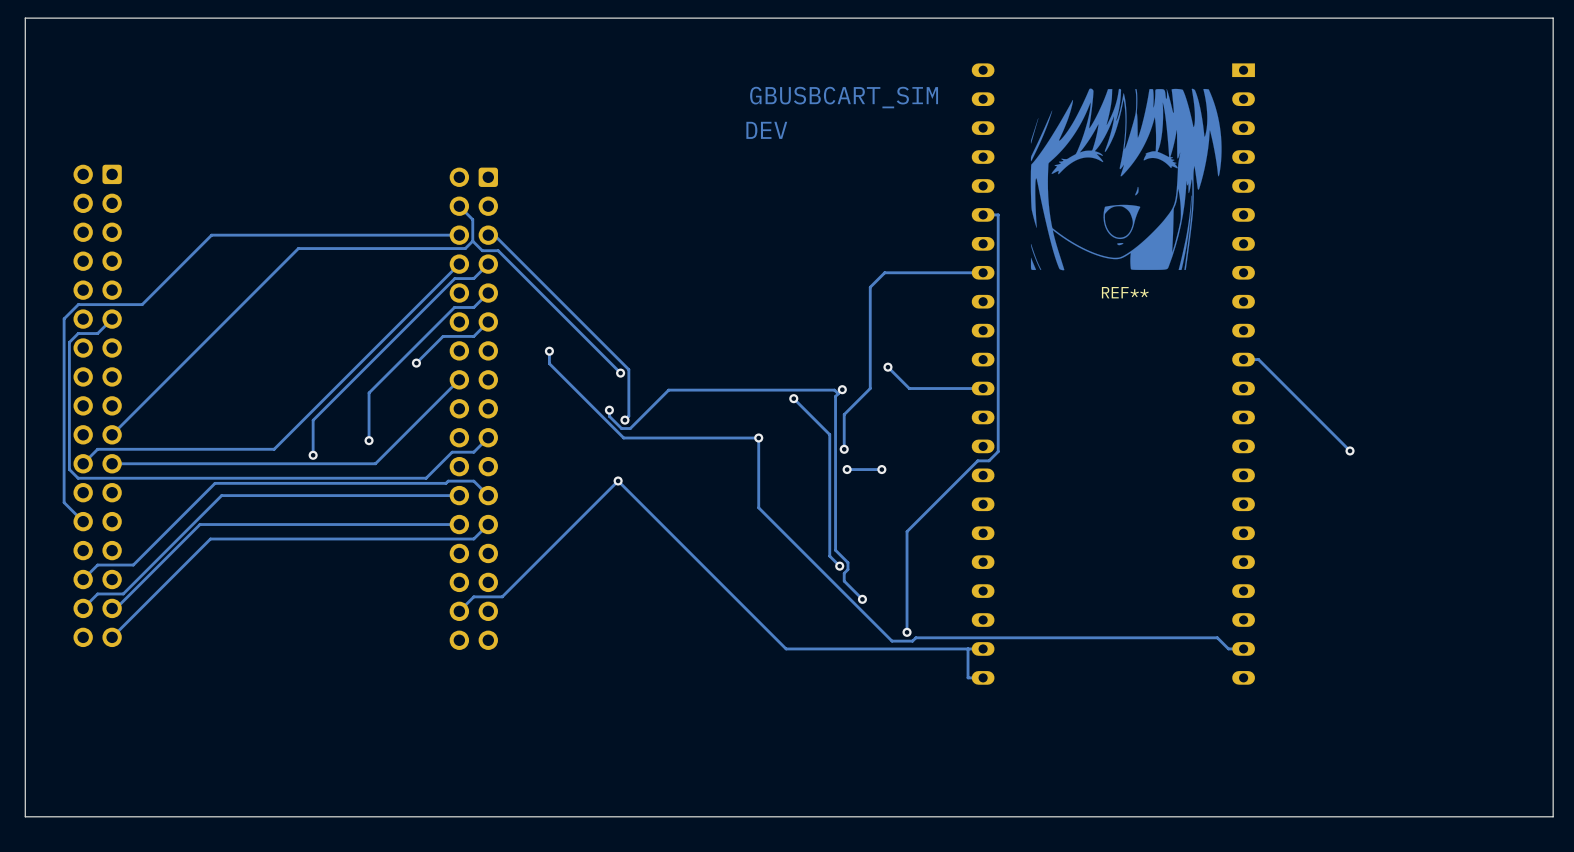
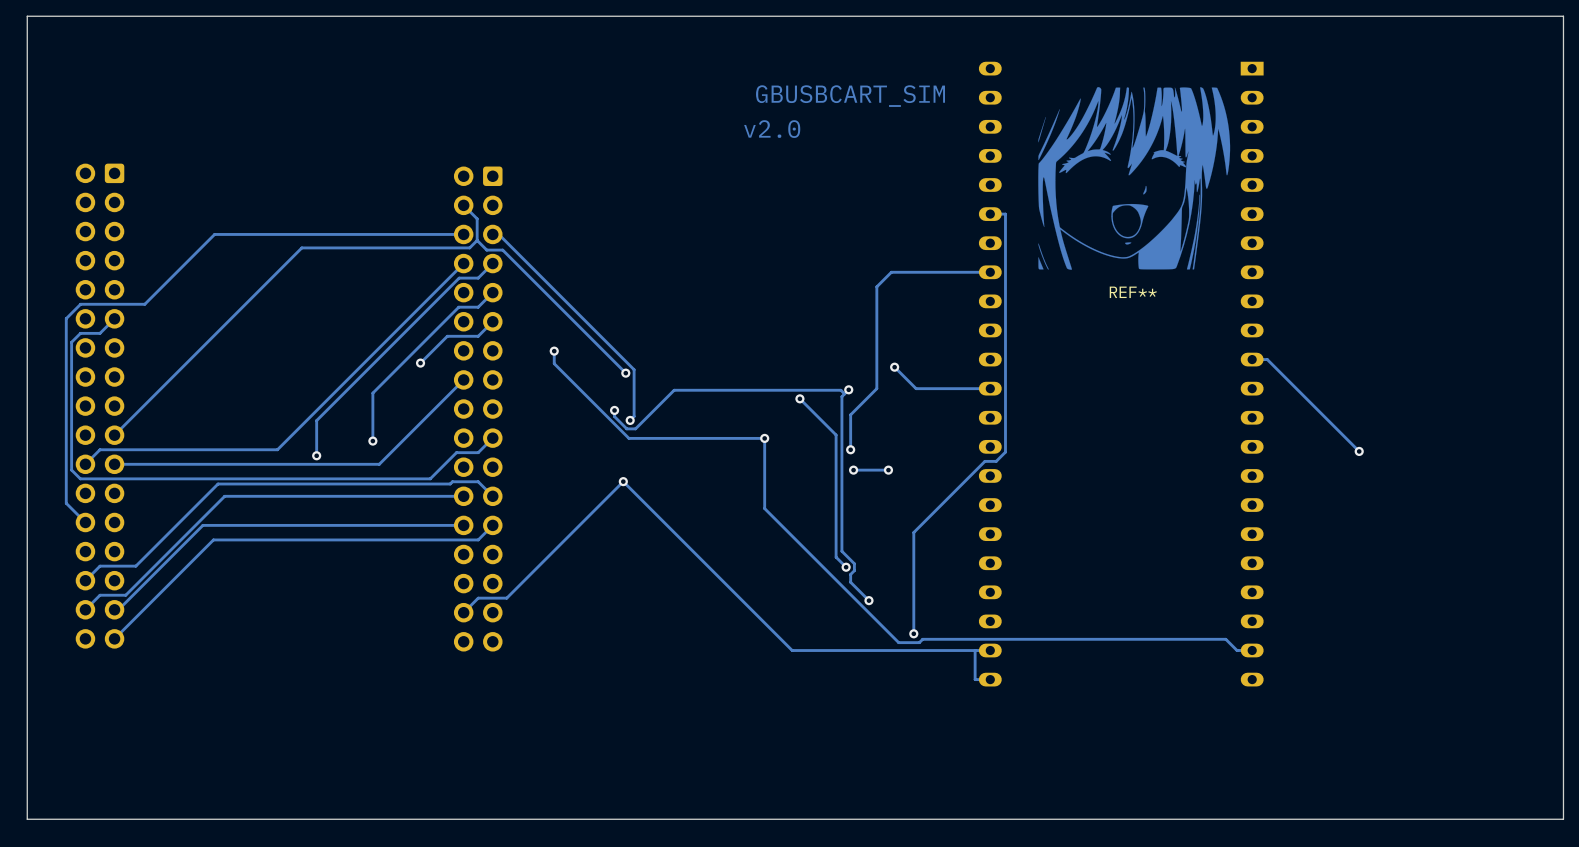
text: DEV (766, 130) -> v2.0 (772, 129)

